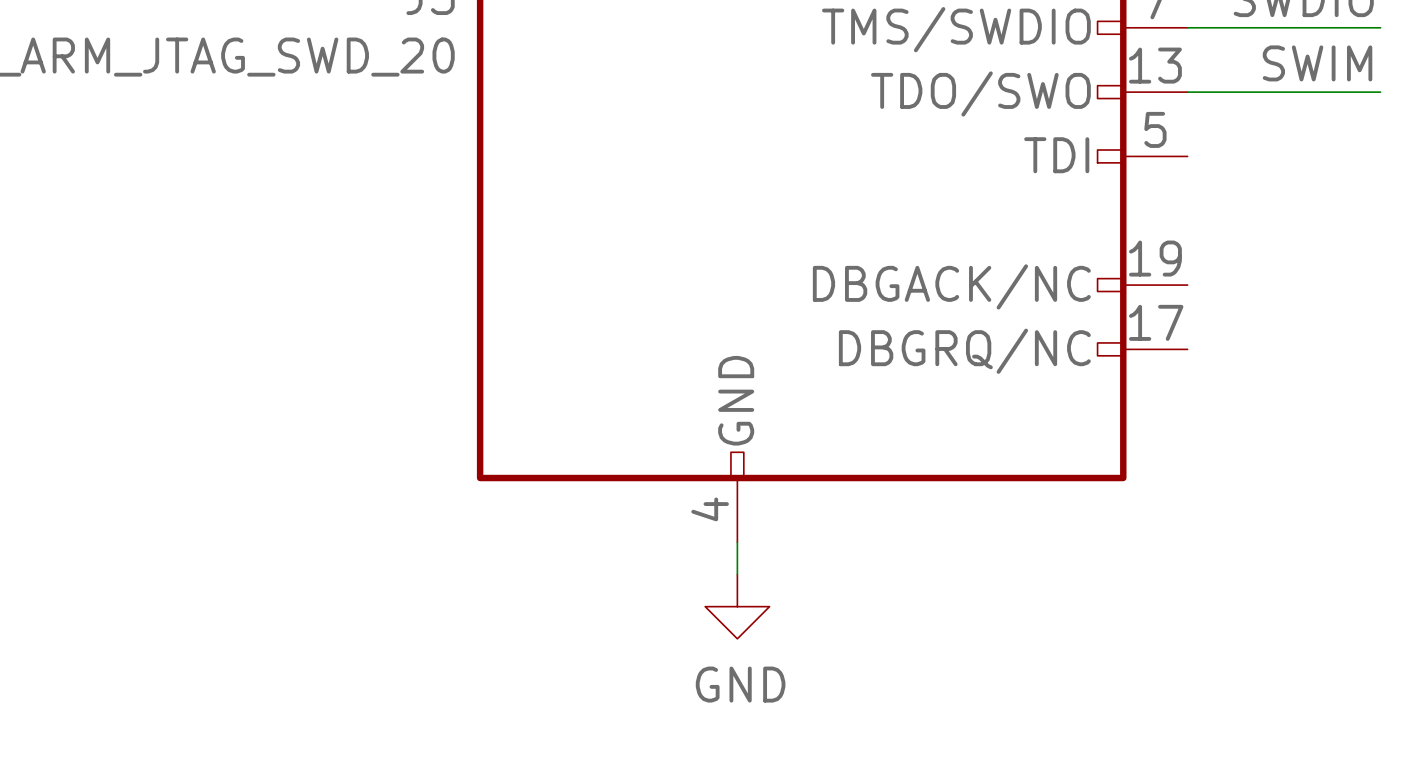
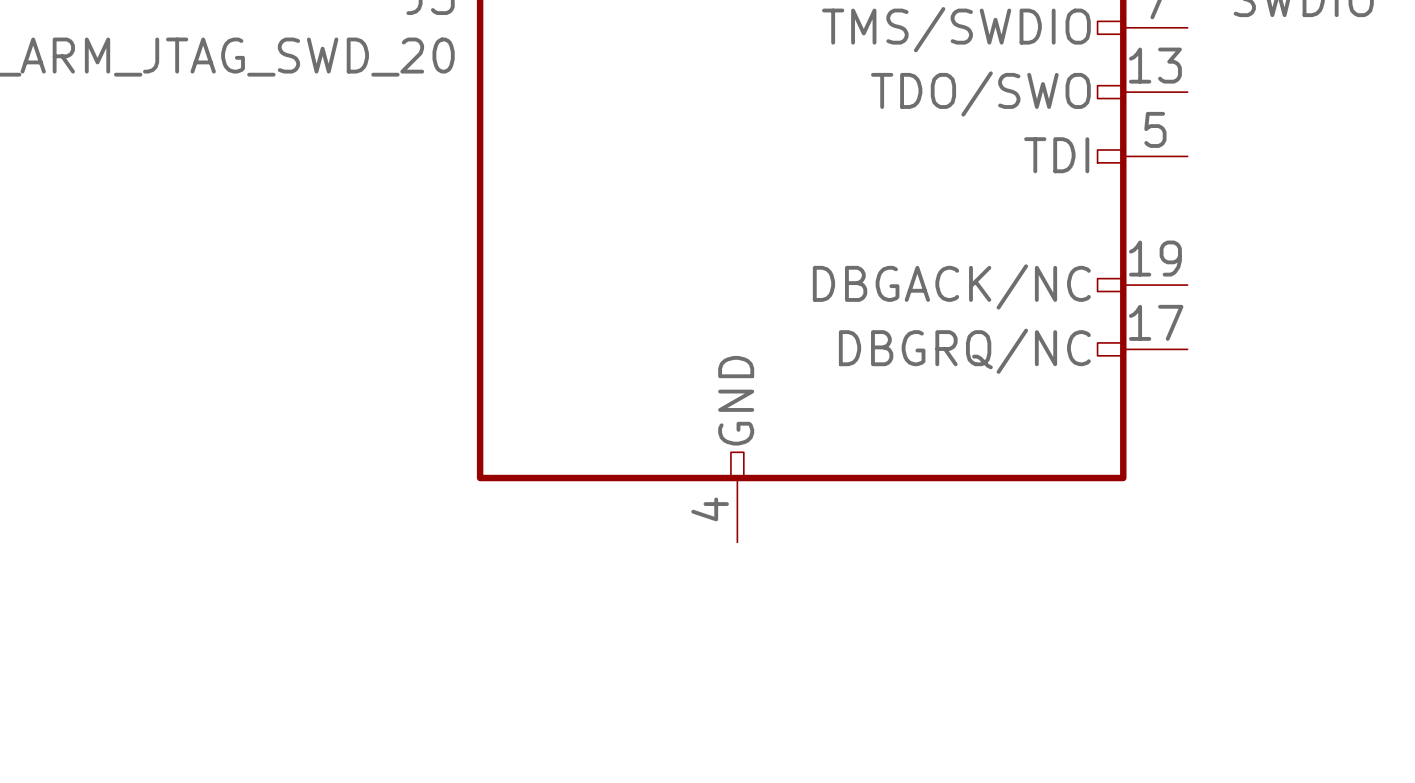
wire: (1187, 27) (1380, 27) -> none
label: SWIM (1317, 63) -> none
wire: (1187, 92) (1380, 92) -> none
wire: (737, 542) (737, 574) -> none
power symbol: GND (737, 606) -> none

